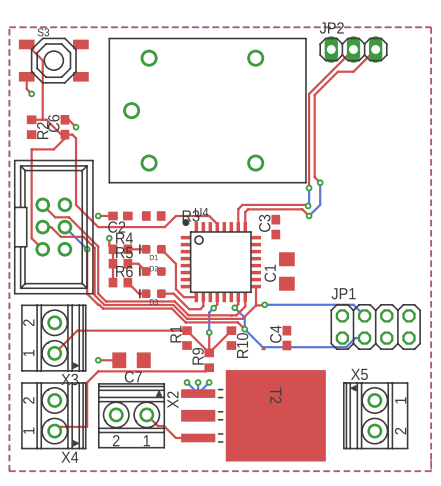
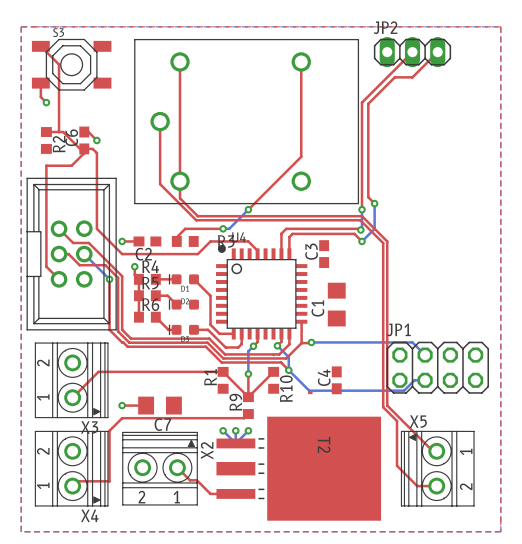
top track: none -> (180, 61) (180, 198) (197, 216) (362, 216) (387, 241) (387, 405) (432, 451) (436, 451)
top track: none -> (301, 61) (301, 156) (248, 209)
top track: none -> (160, 121) (160, 184) (196, 220) (360, 220) (383, 243) (383, 407) (397, 421) (397, 465) (417, 486) (436, 486)
bottom track: none -> (248, 209) (229, 228) (223, 228)
via: none -> (248, 209)
top track: none -> (223, 228) (185, 228) (176, 237) (176, 241)
via: none -> (223, 228)

